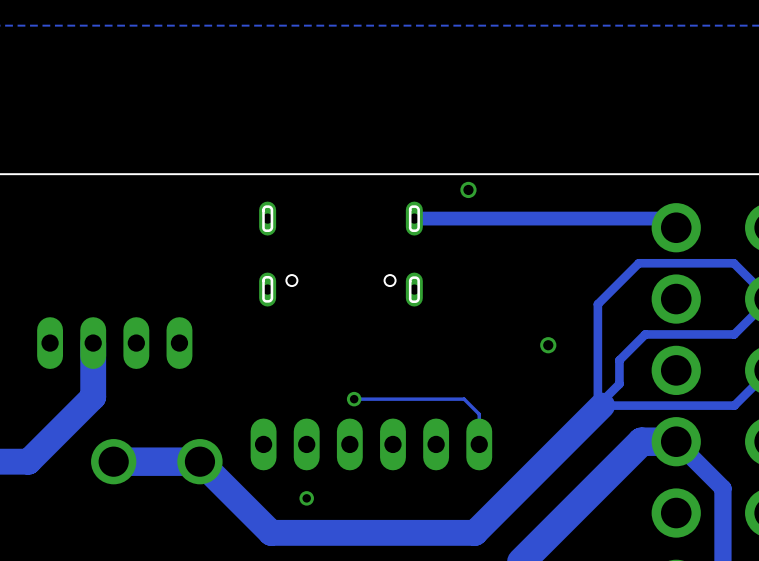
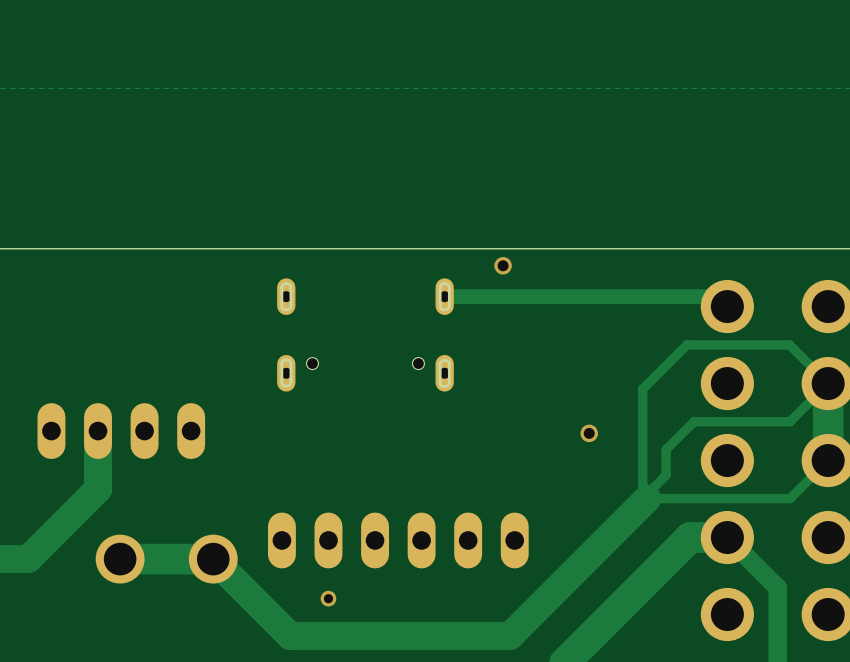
track: (354, 399) (464, 399) (479, 414) (479, 444) -> none
via: (354, 399) -> none

